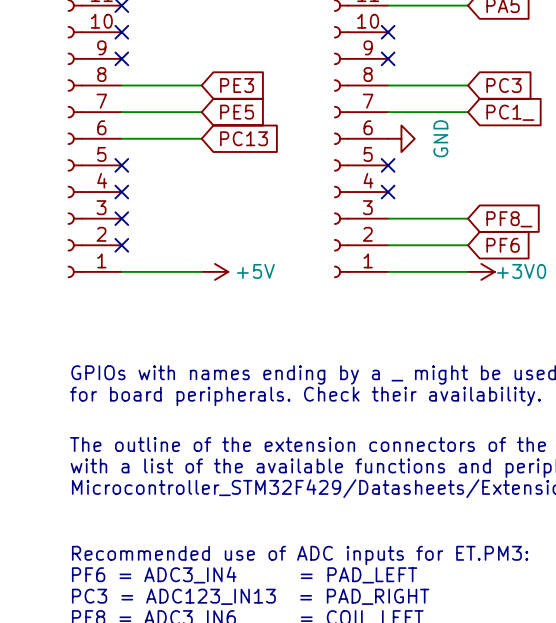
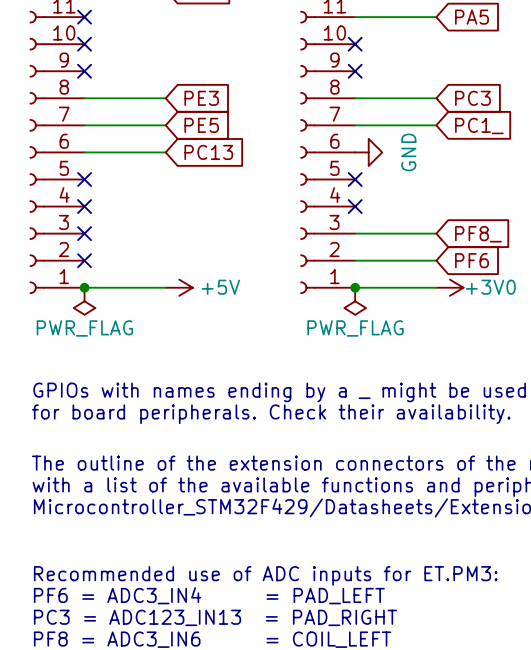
junction: none -> (84, 287)
junction: none -> (355, 287)
power symbol: none -> PWR_FLAG (84, 301)
power symbol: none -> PWR_FLAG (355, 301)

